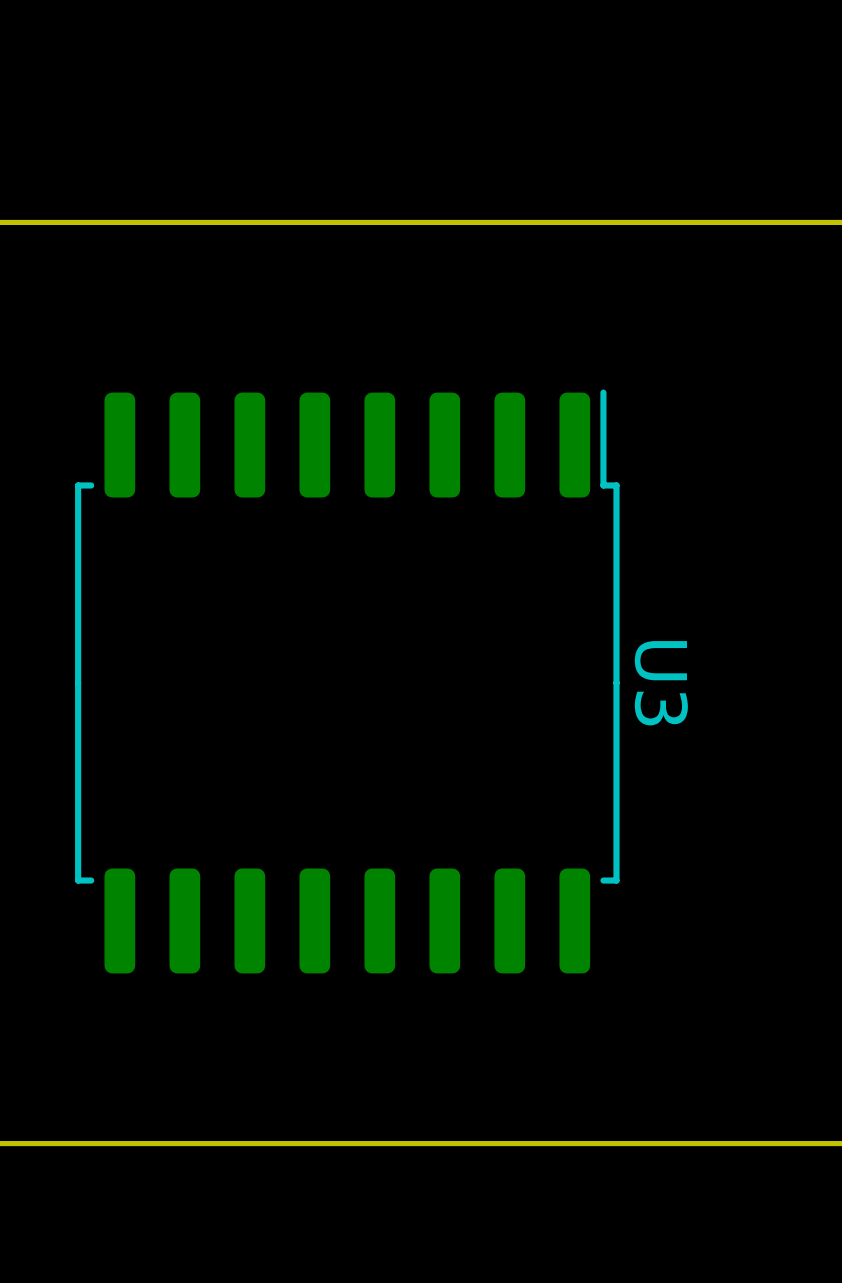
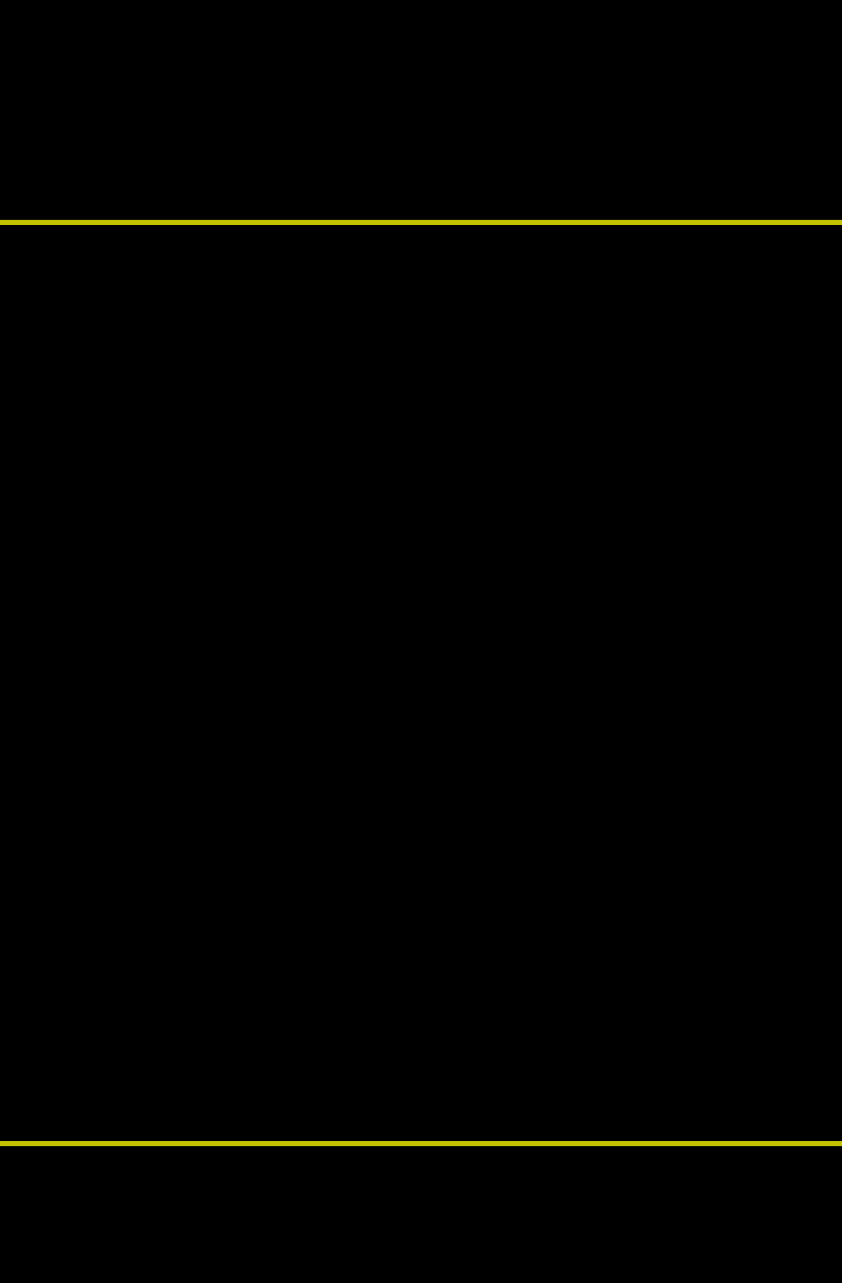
U3: (347, 681) -> none

